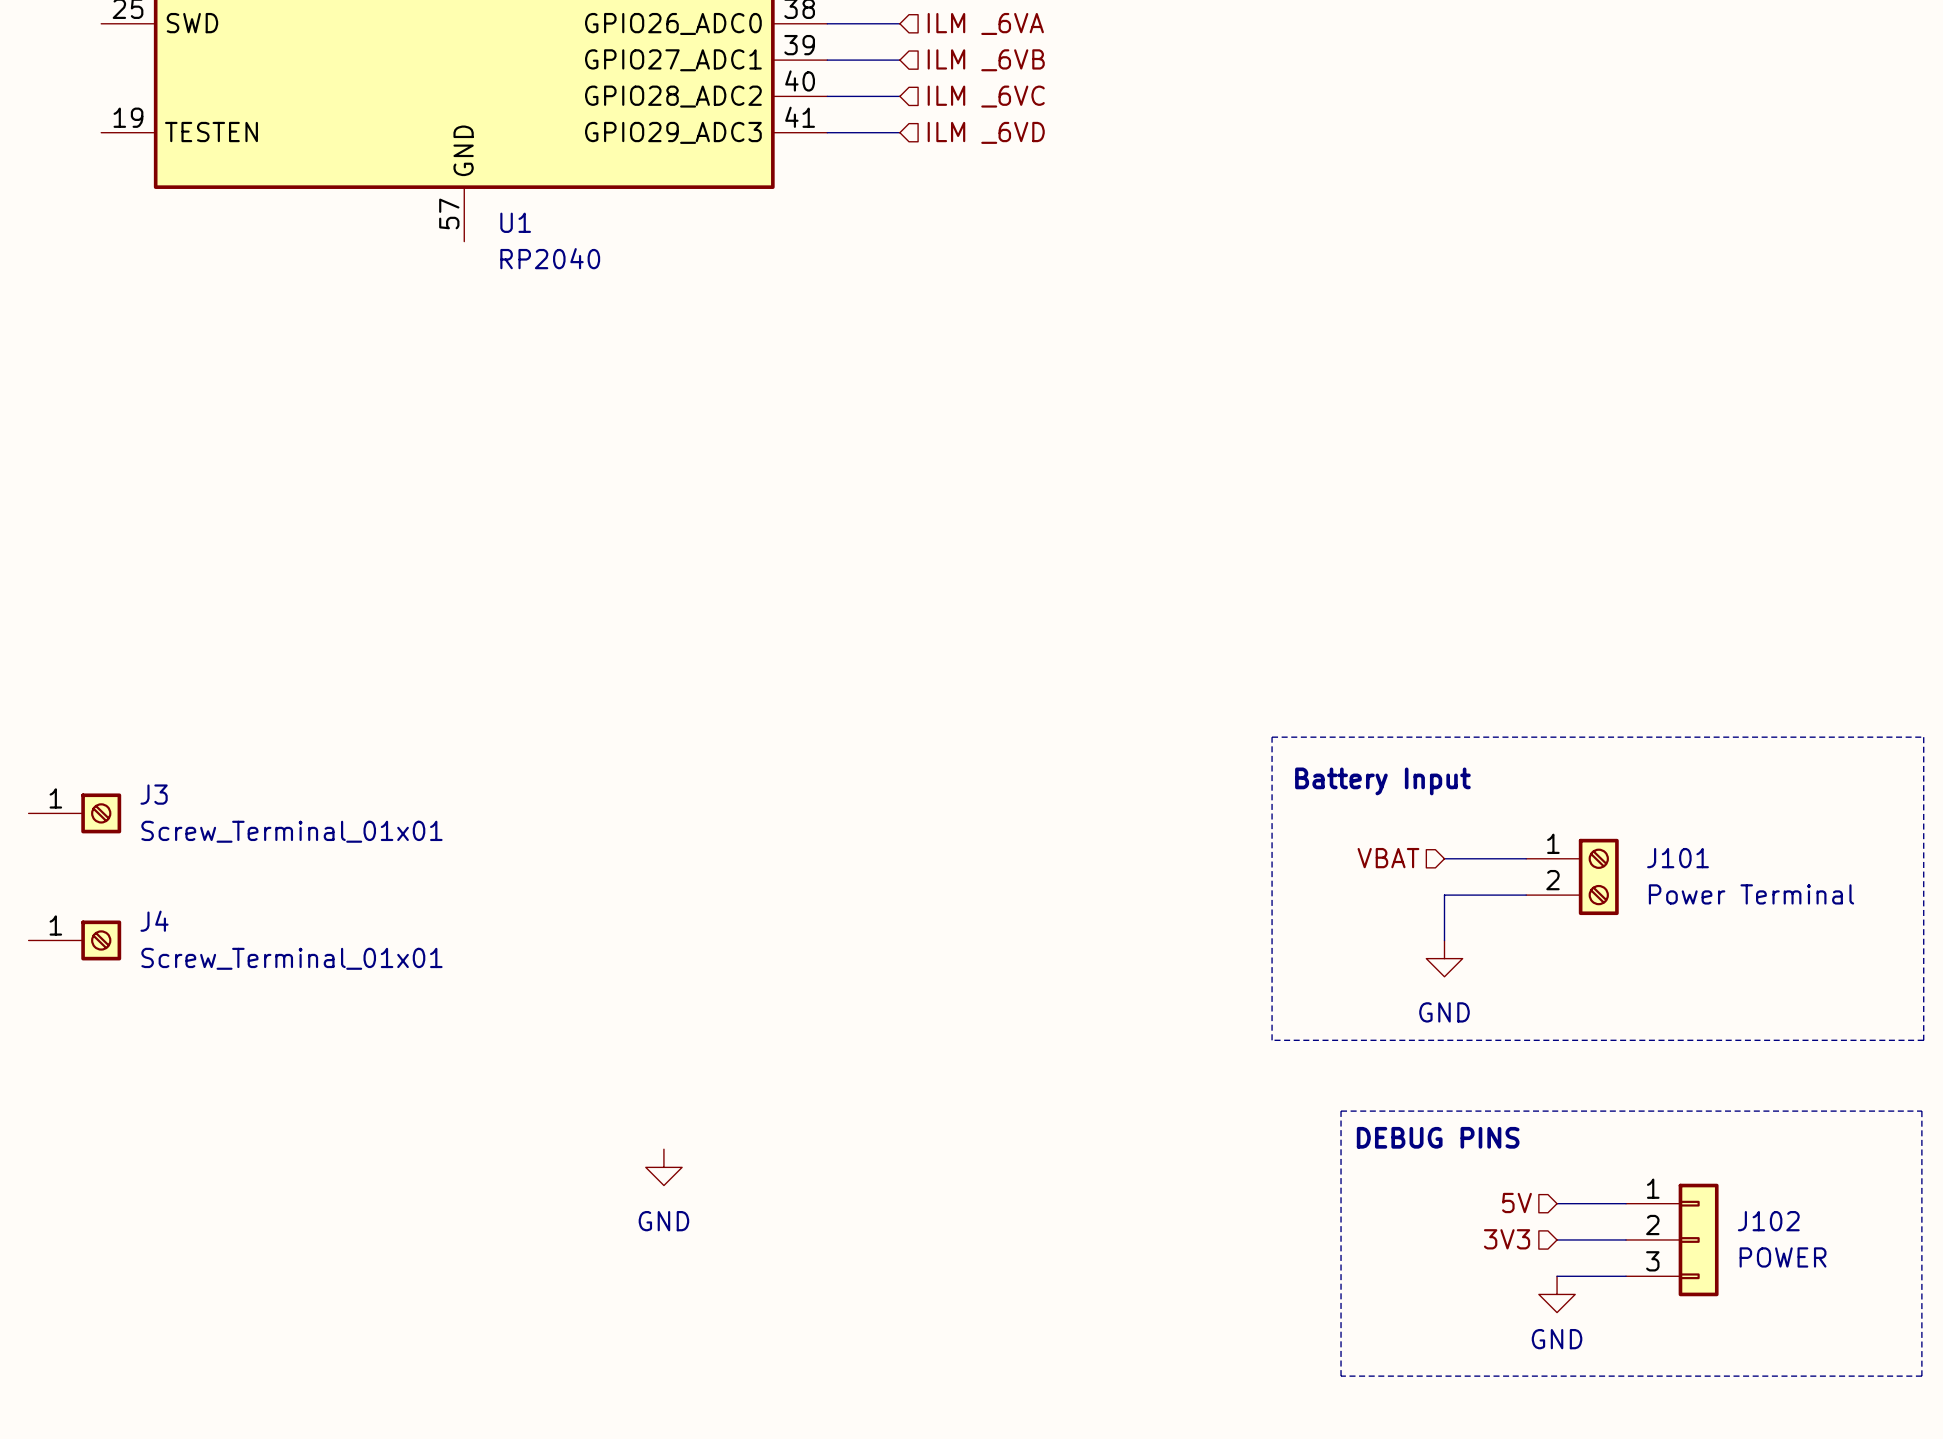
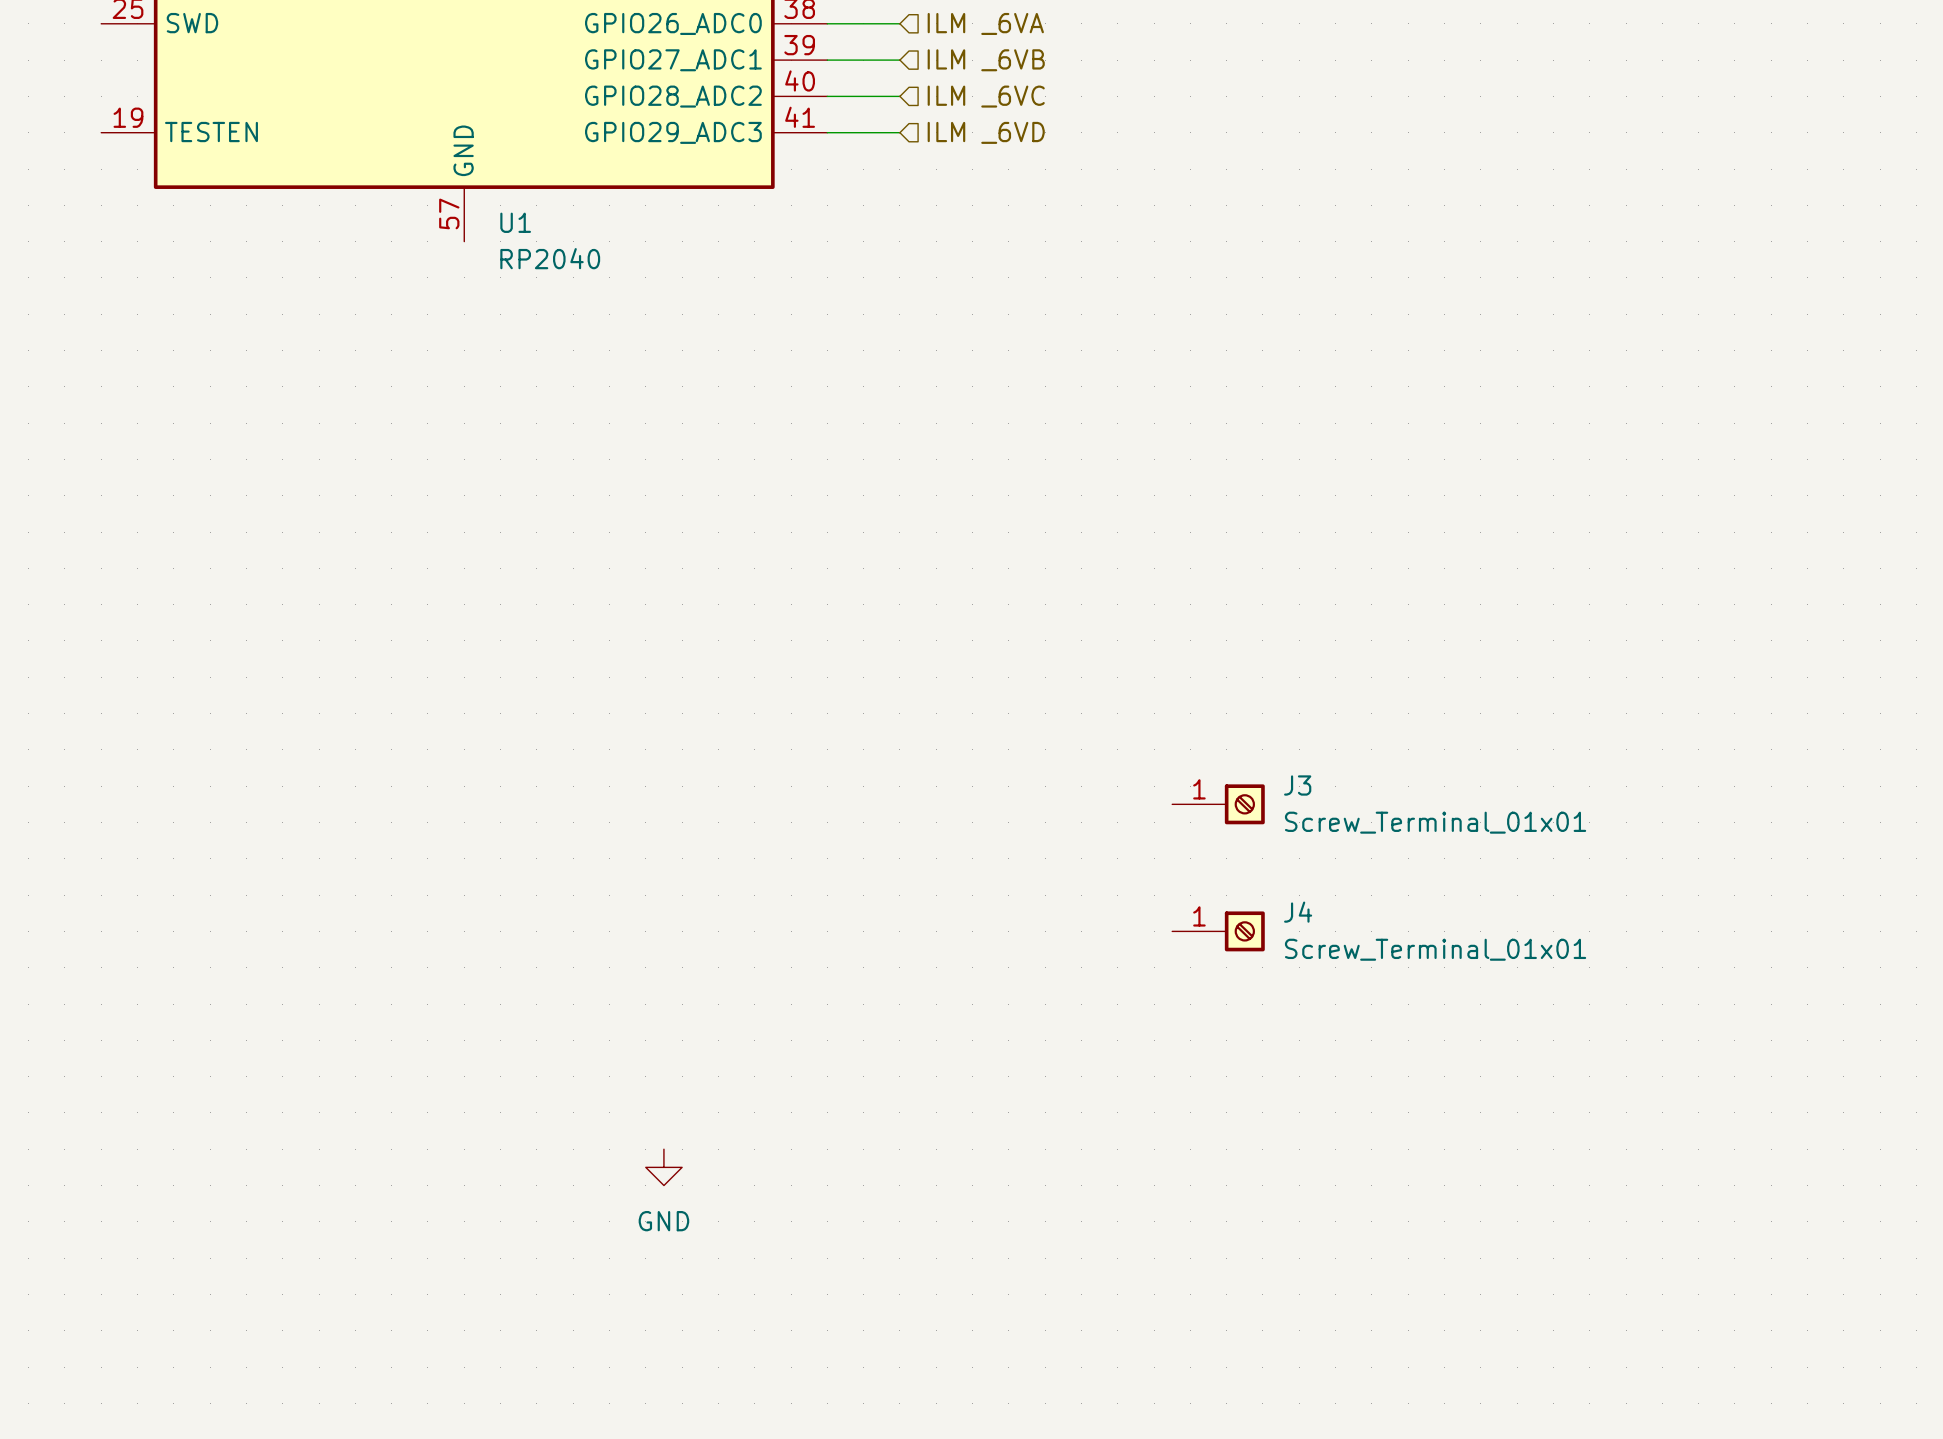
line: (1272, 737) (1923, 737) (1923, 1040) (1272, 1040) (1272, 737) -> none
text: Battery Input (1382, 781) -> none
J3 position: (74, 813) -> (1218, 804)
hierarchical label: VBAT (1388, 858) -> none
wire: (1444, 858) (1526, 858) -> none
J101: Power Terminal (1572, 876) -> none
wire: (1526, 895) (1444, 895) (1444, 940) -> none
J4 position: (74, 940) -> (1218, 931)
power symbol: GND (1444, 958) -> none
line: (1341, 1111) (1921, 1111) (1921, 1376) (1341, 1376) (1341, 1111) -> none
text: DEBUG PINS (1438, 1137) -> none
hierarchical label: 5V (1516, 1203) -> none
wire: (1557, 1203) (1626, 1203) -> none
hierarchical label: 3V3 (1507, 1239) -> none
wire: (1557, 1239) (1626, 1239) -> none
J102: POWER (1672, 1239) -> none
wire: (1557, 1276) (1626, 1276) -> none
power symbol: GND (1557, 1294) -> none

